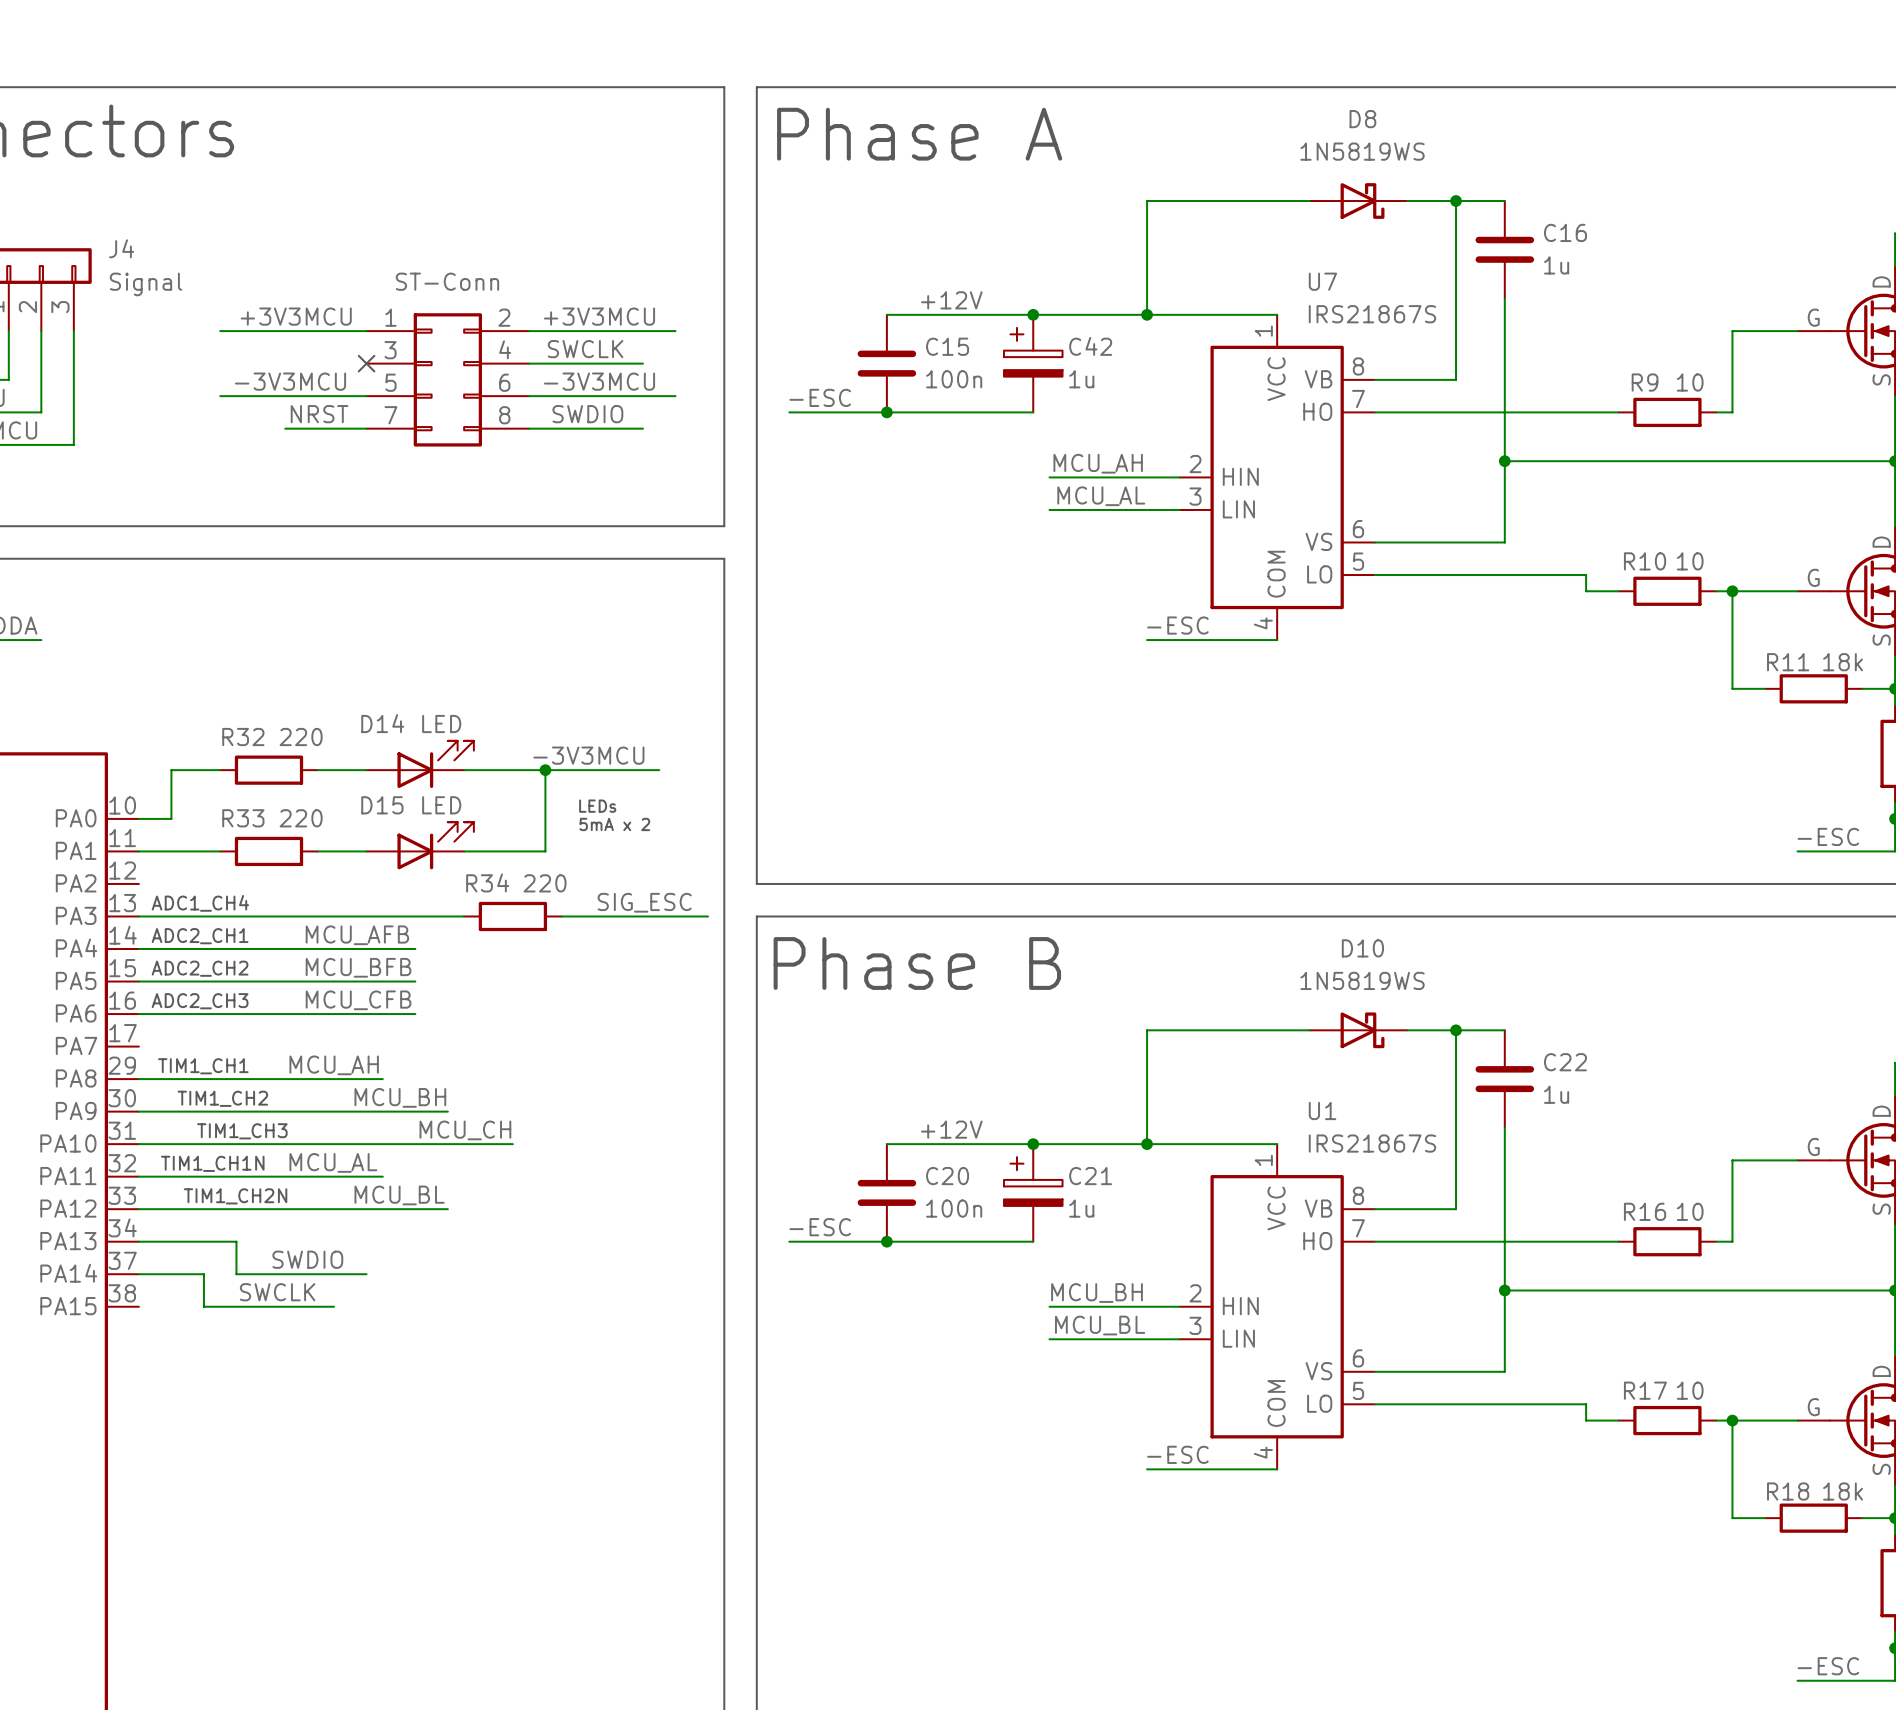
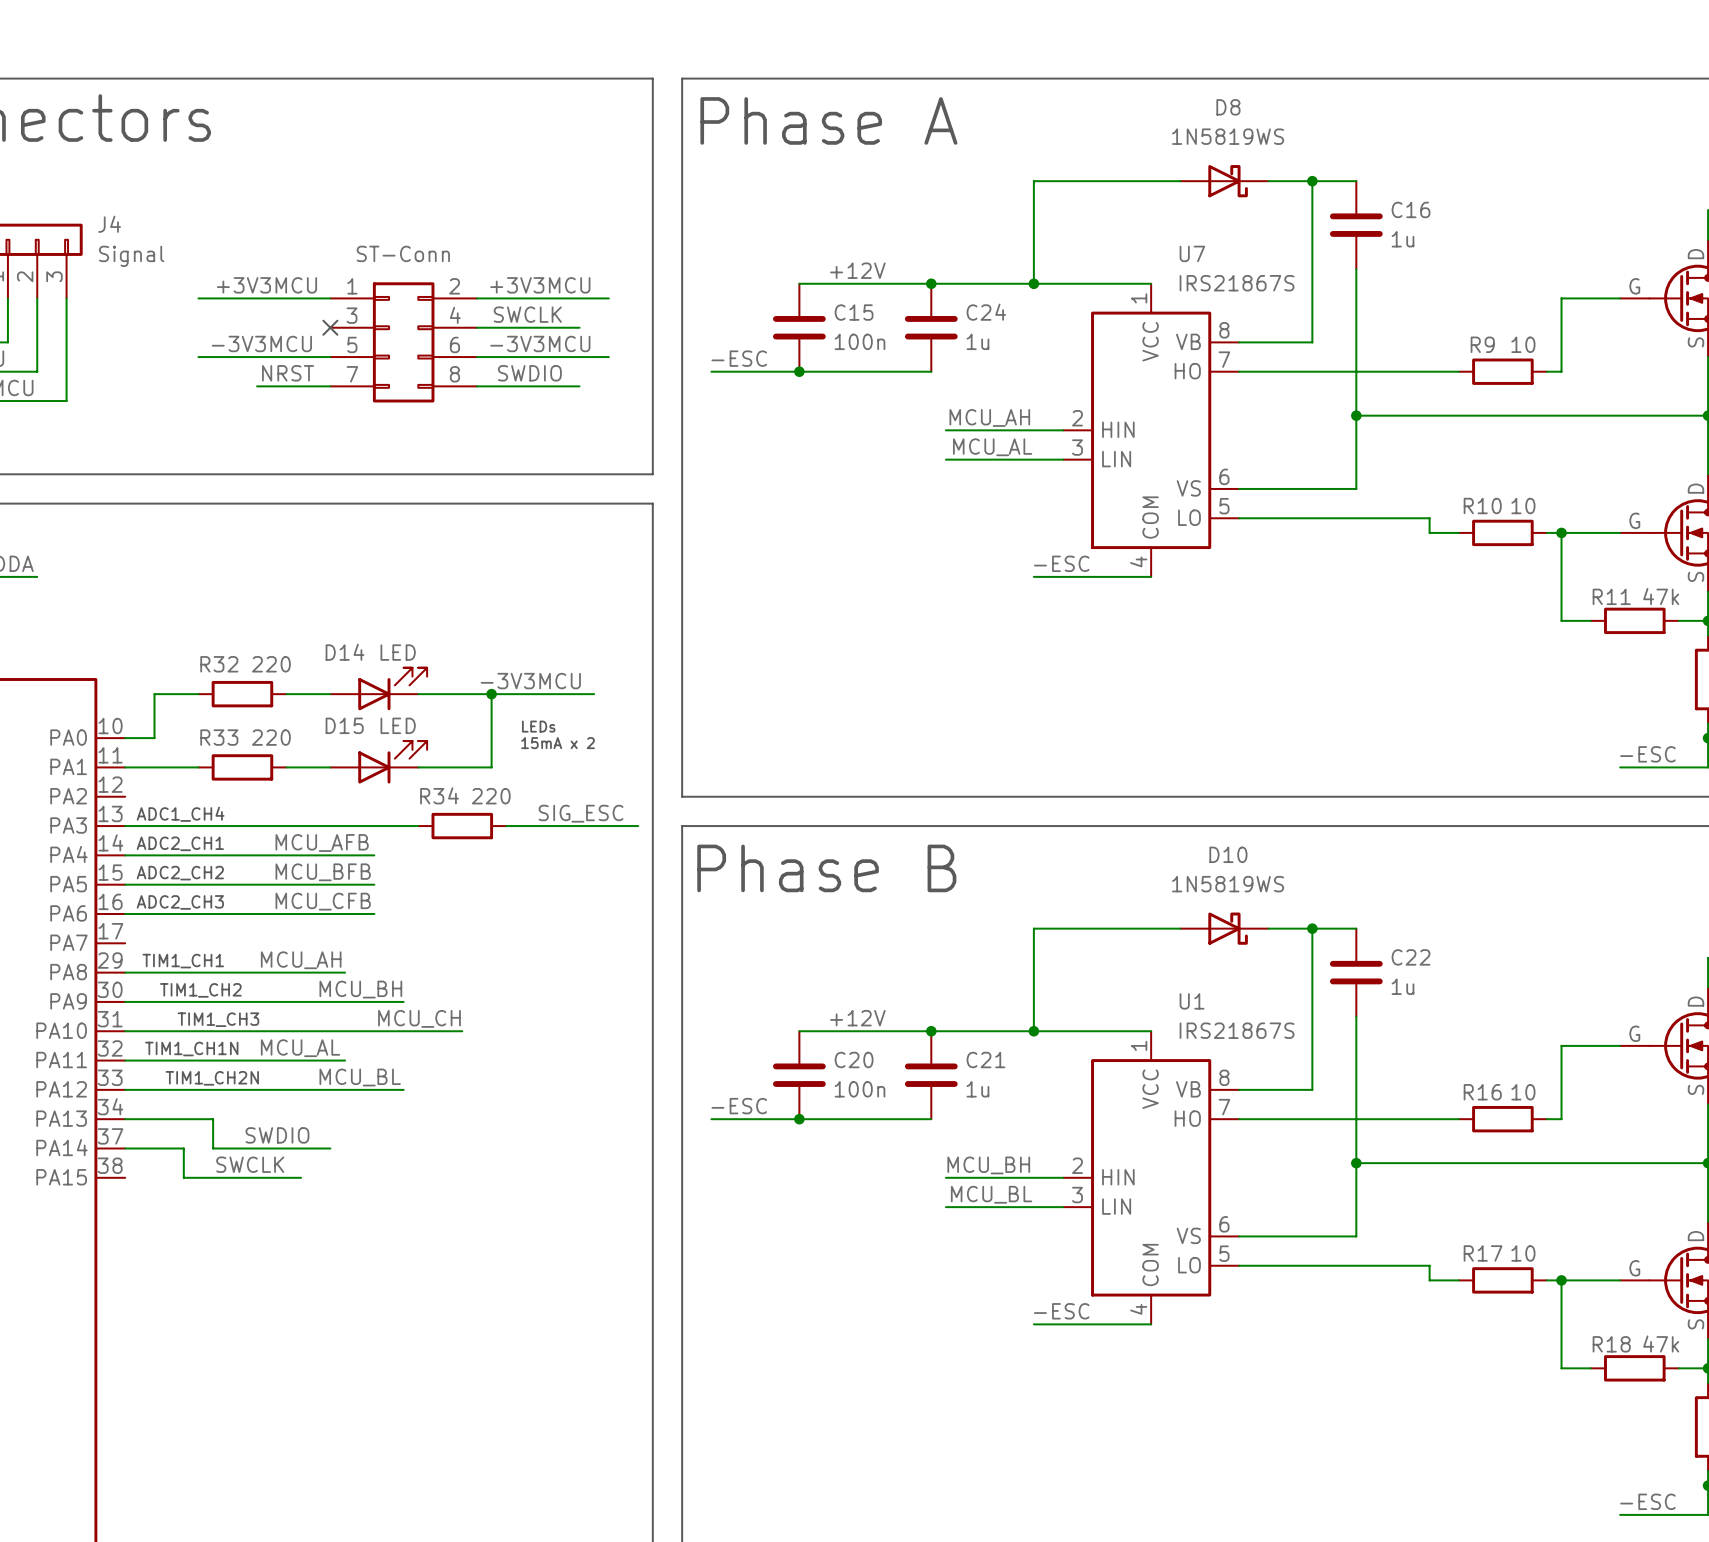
C42: 1u (1033, 363) -> none
C24: none -> 1u (931, 327)
R11 value: 18k (1843, 662) -> 47k (1661, 596)
text: 5mA x 2 (614, 824) -> 15mA x 2 (558, 743)
C21 symbol: [1003, 1144, 1063, 1242] -> [904, 1031, 958, 1120]
R18 value: 18k (1843, 1491) -> 47k (1661, 1343)

